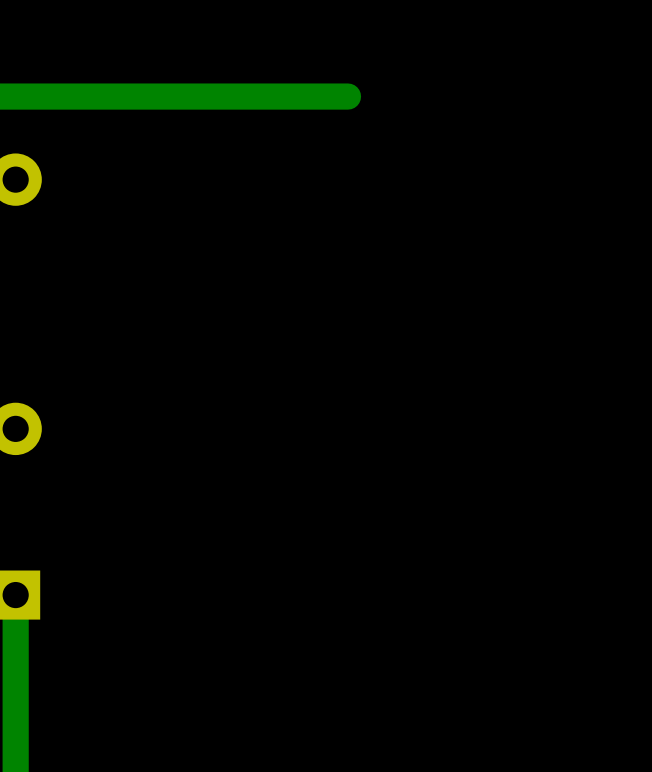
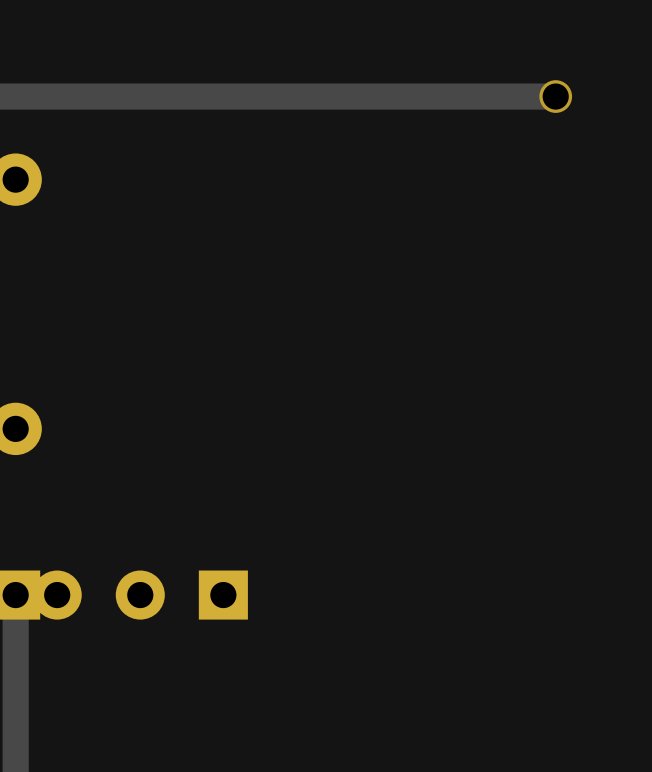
track: none -> (555, 96) (348, 96)
via: none -> (555, 96)
part: none -> (140, 595)

